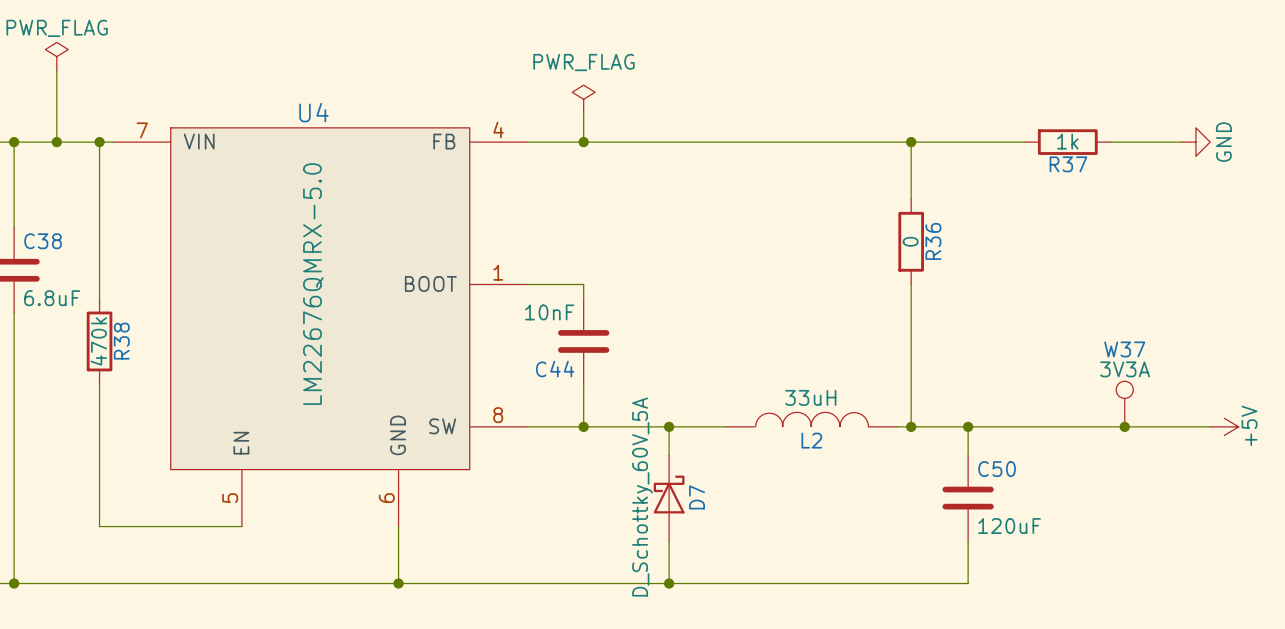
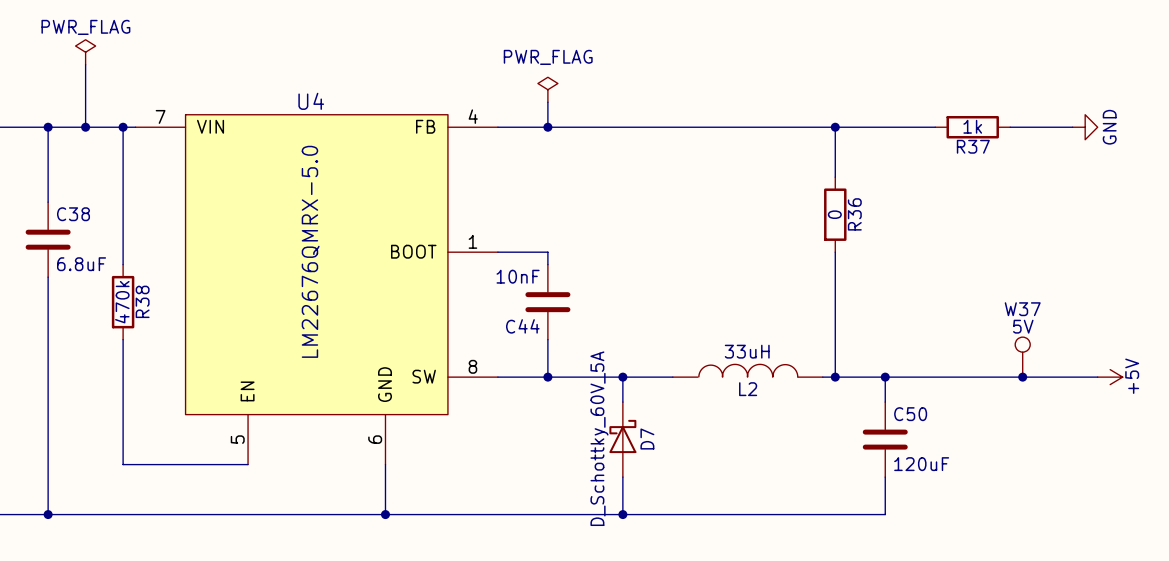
W37 value: 3V3A (1125, 369) -> 5V (1023, 326)

